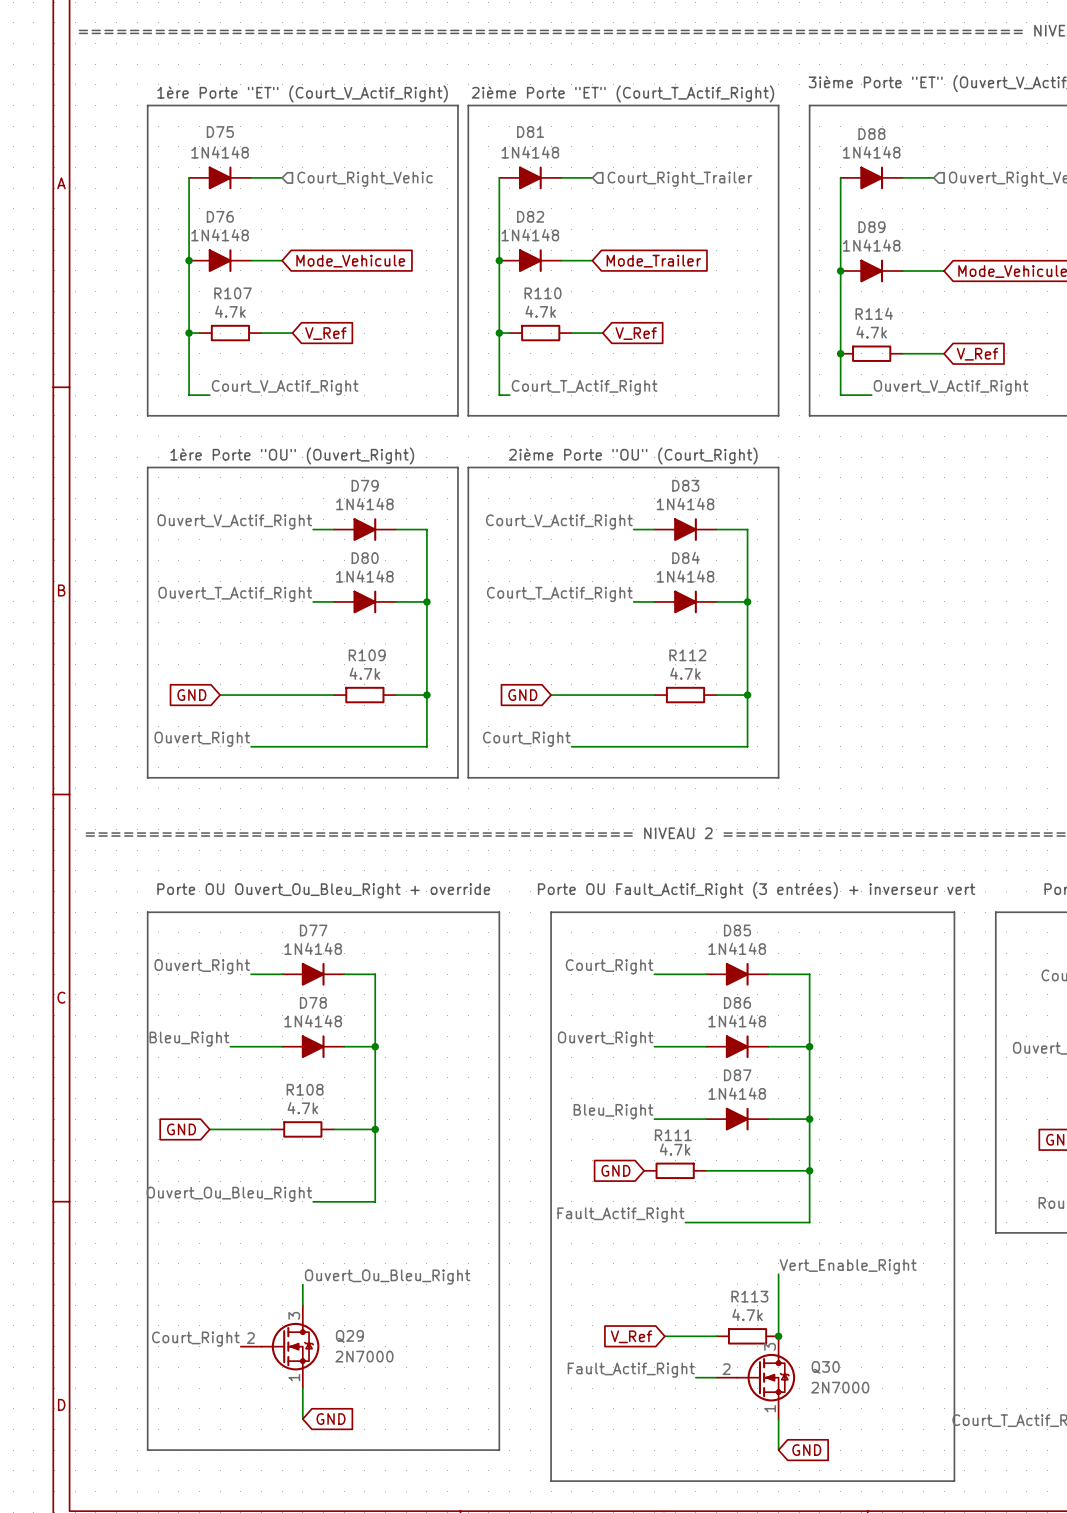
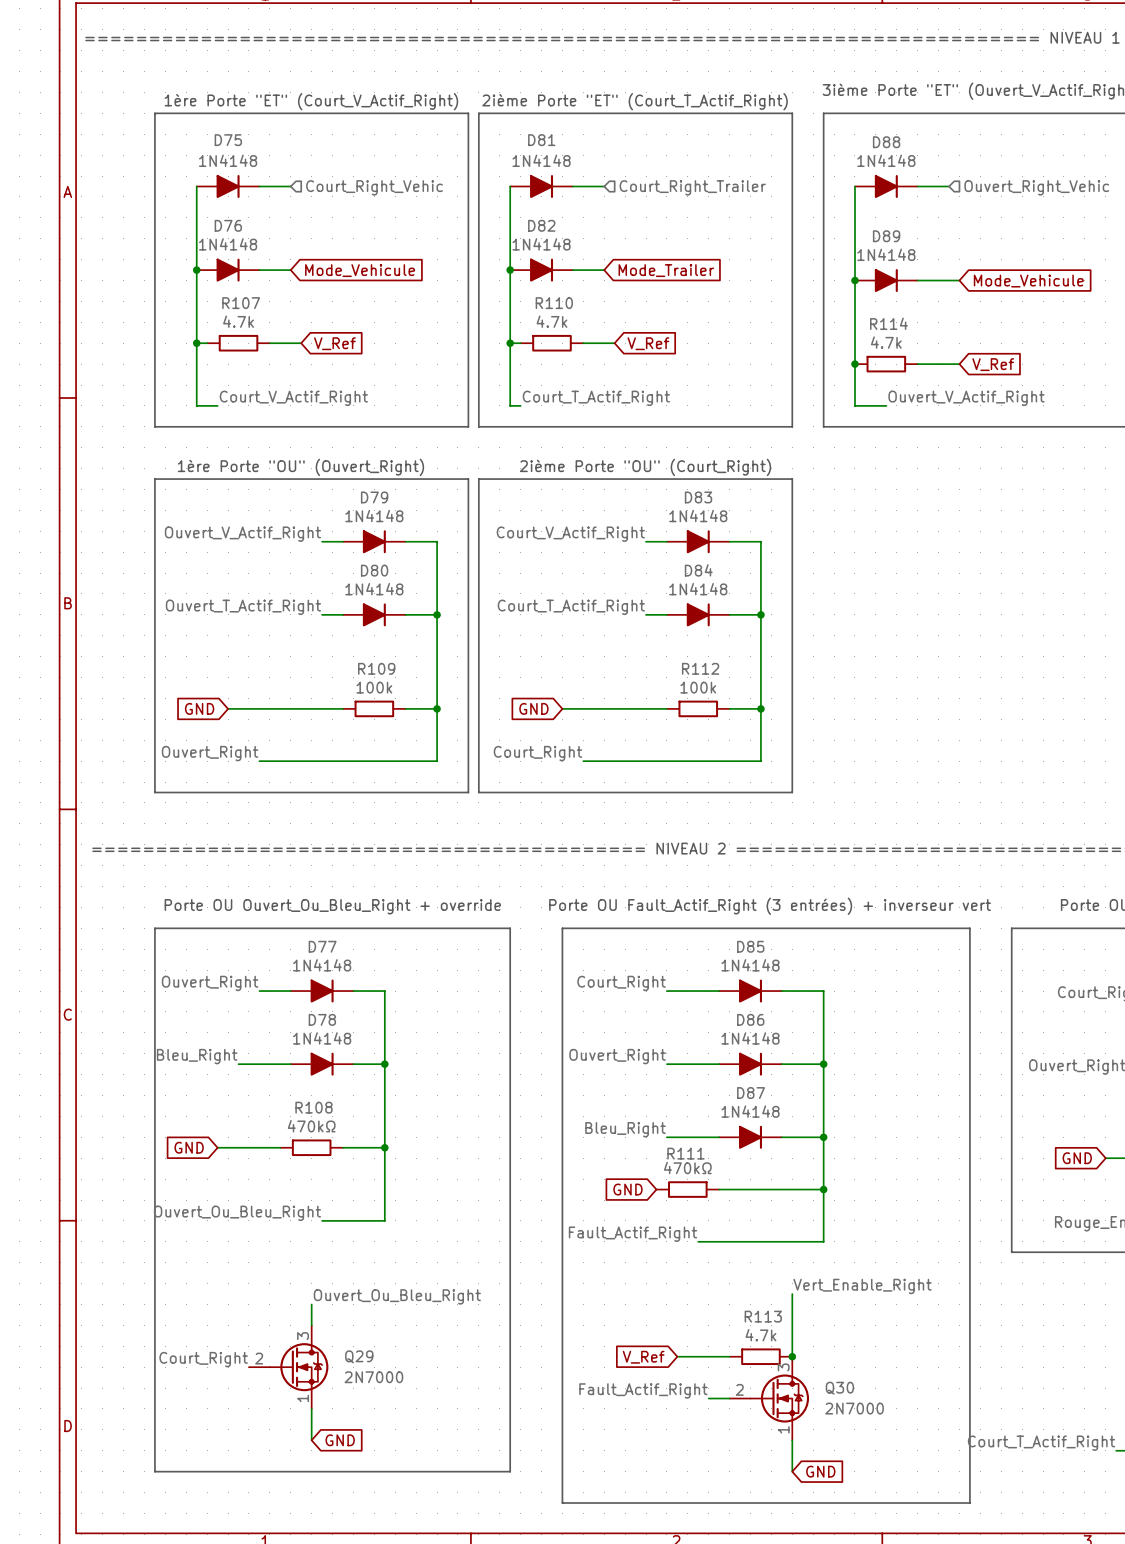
R109 value: 4.7k (364, 673) -> 100k (374, 687)
R112 value: 4.7k (685, 673) -> 100k (698, 687)
R108 value: 4.7k (302, 1108) -> 470kΩ (311, 1126)
R111 value: 4.7k (675, 1149) -> 470kΩ (687, 1168)

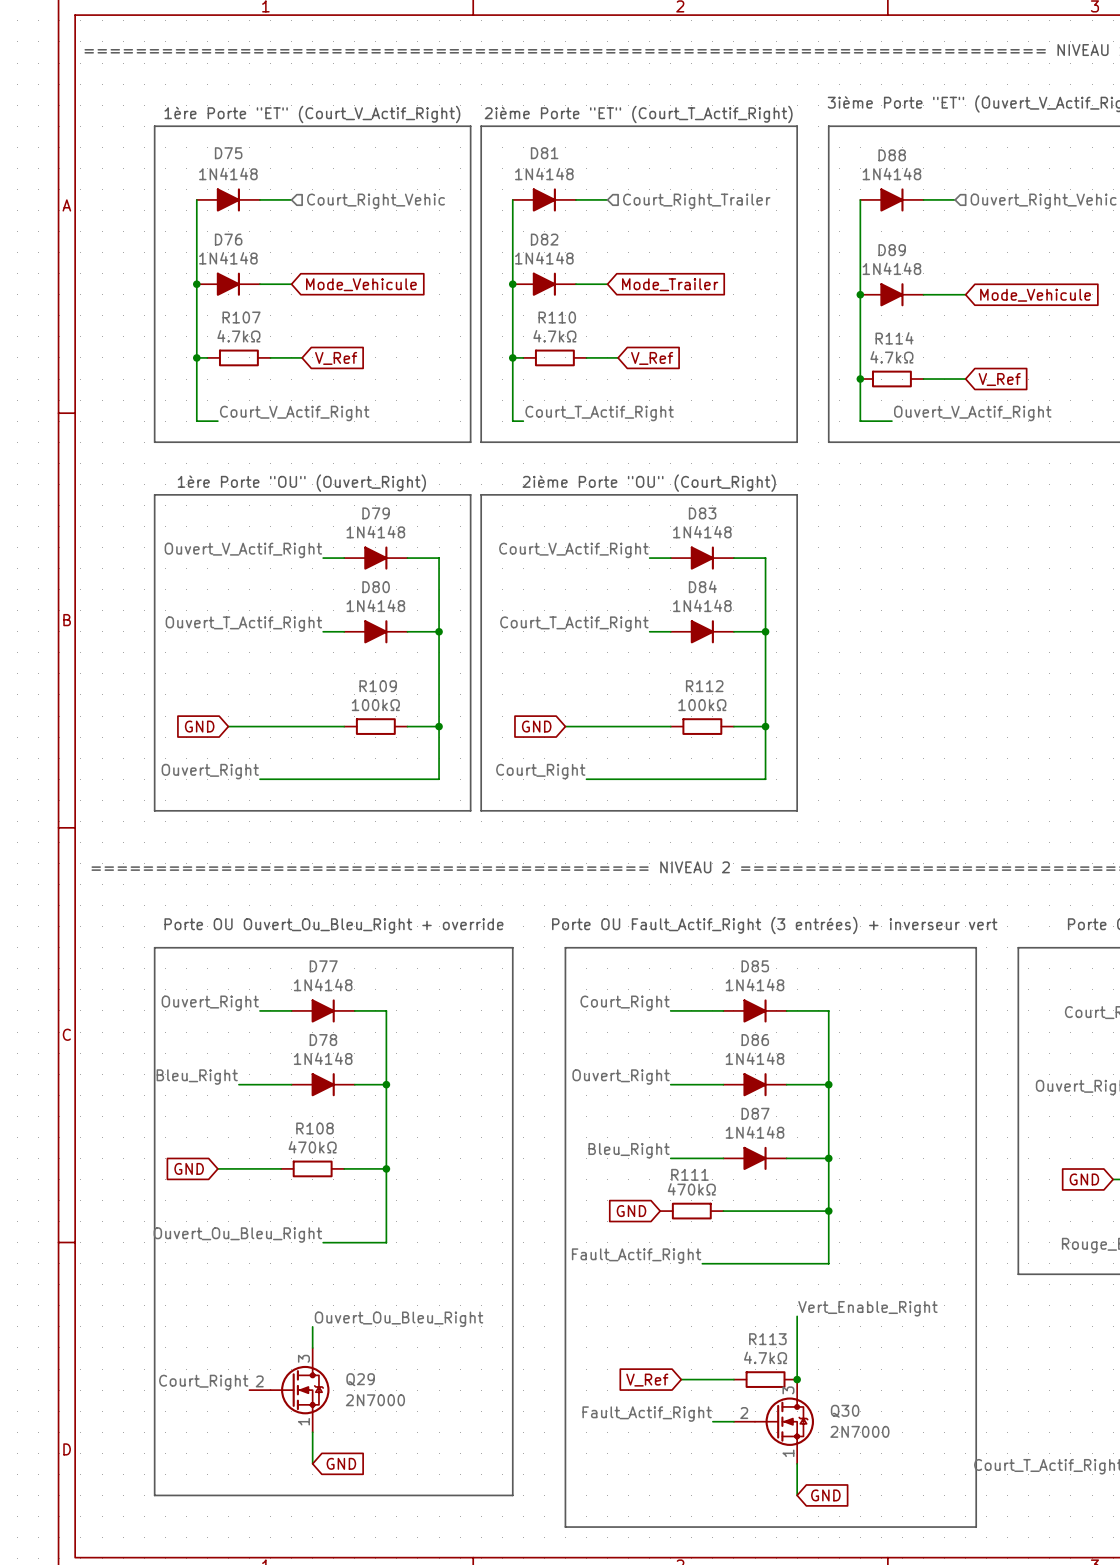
R107 value: 4.7k (238, 321) -> 4.7kΩ (238, 336)
R110 value: 4.7k (551, 321) -> 4.7kΩ (554, 336)
R114 value: 4.7k (886, 342) -> 4.7kΩ (891, 357)
R109 value: 100k (374, 687) -> 100kΩ (375, 705)
R112 value: 100k (698, 687) -> 100kΩ (702, 705)
R113 value: 4.7k (760, 1335) -> 4.7kΩ (765, 1357)

